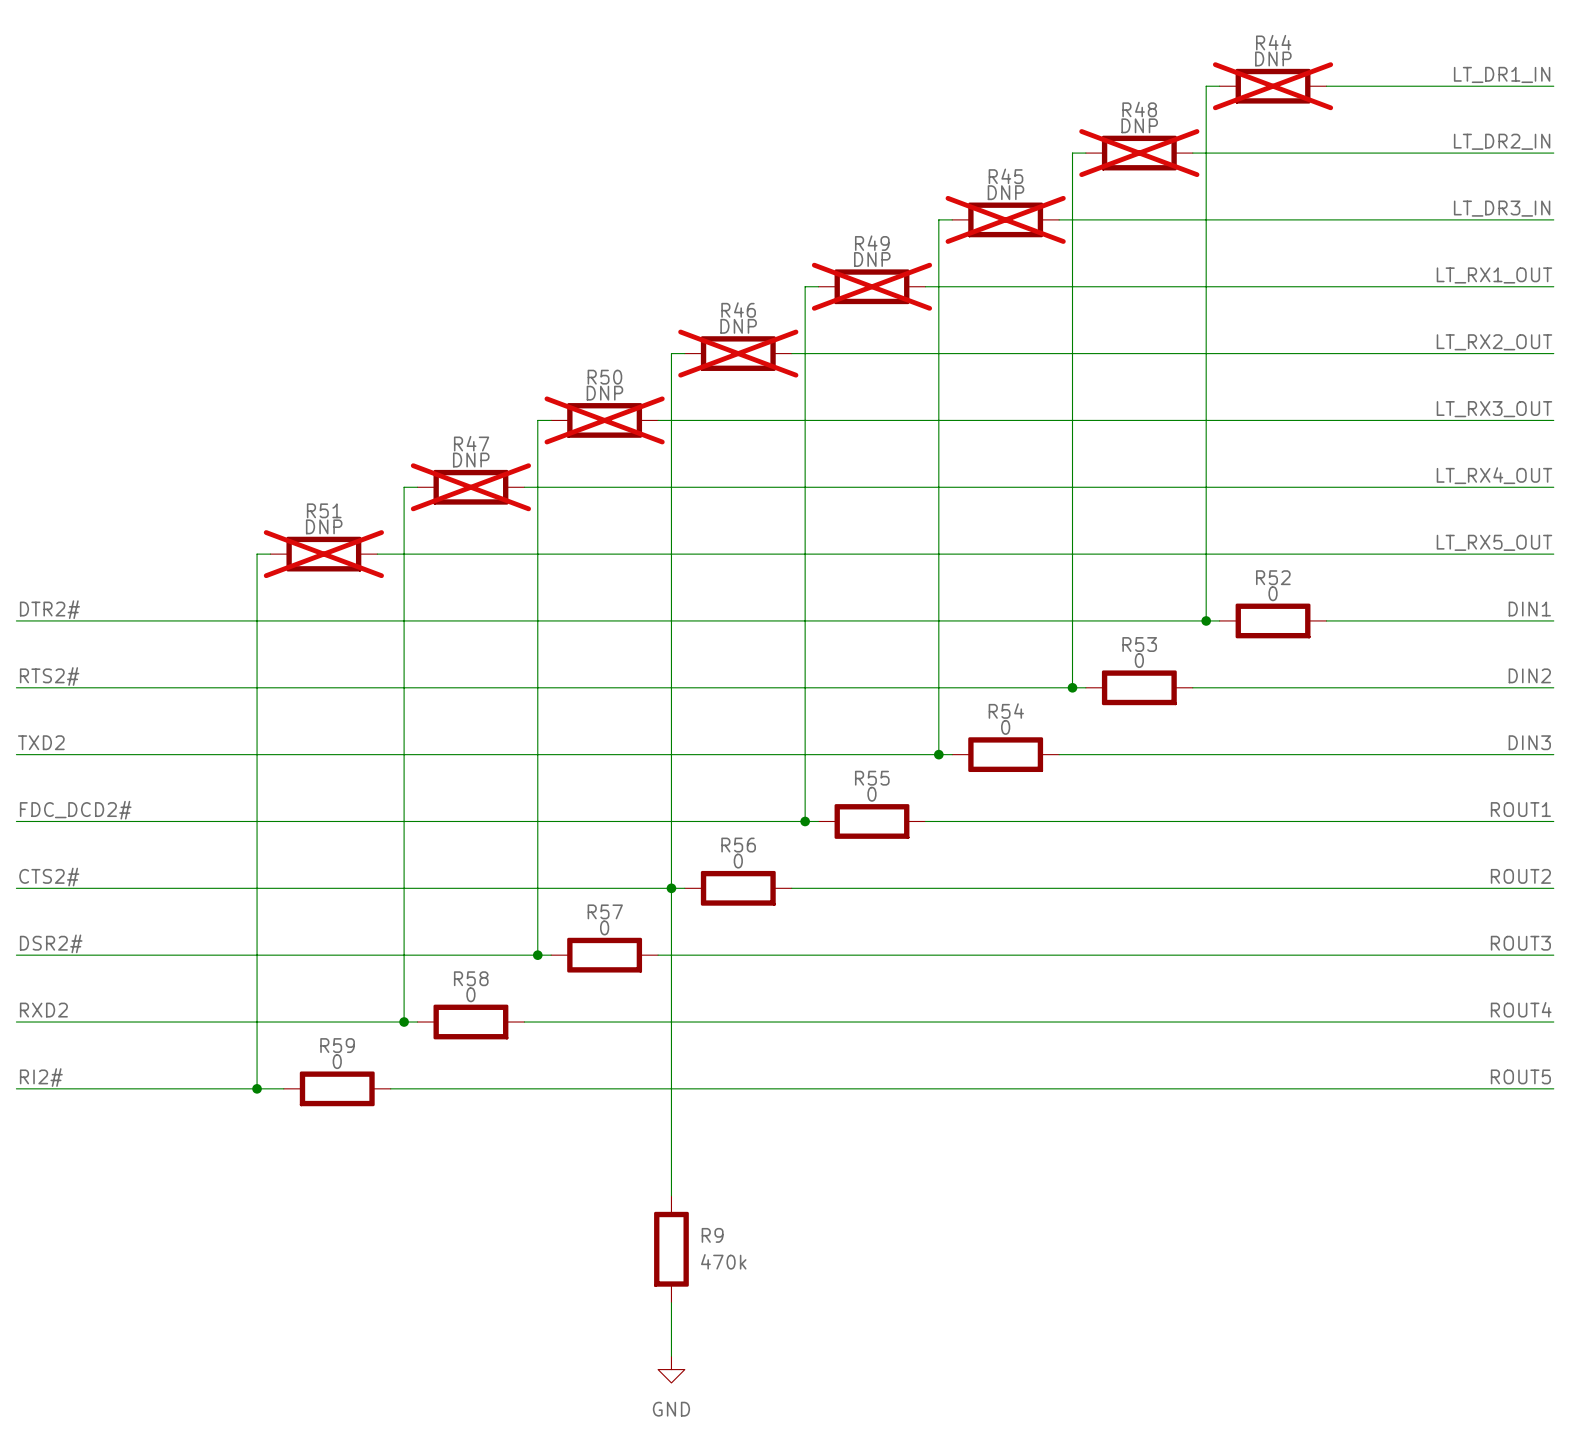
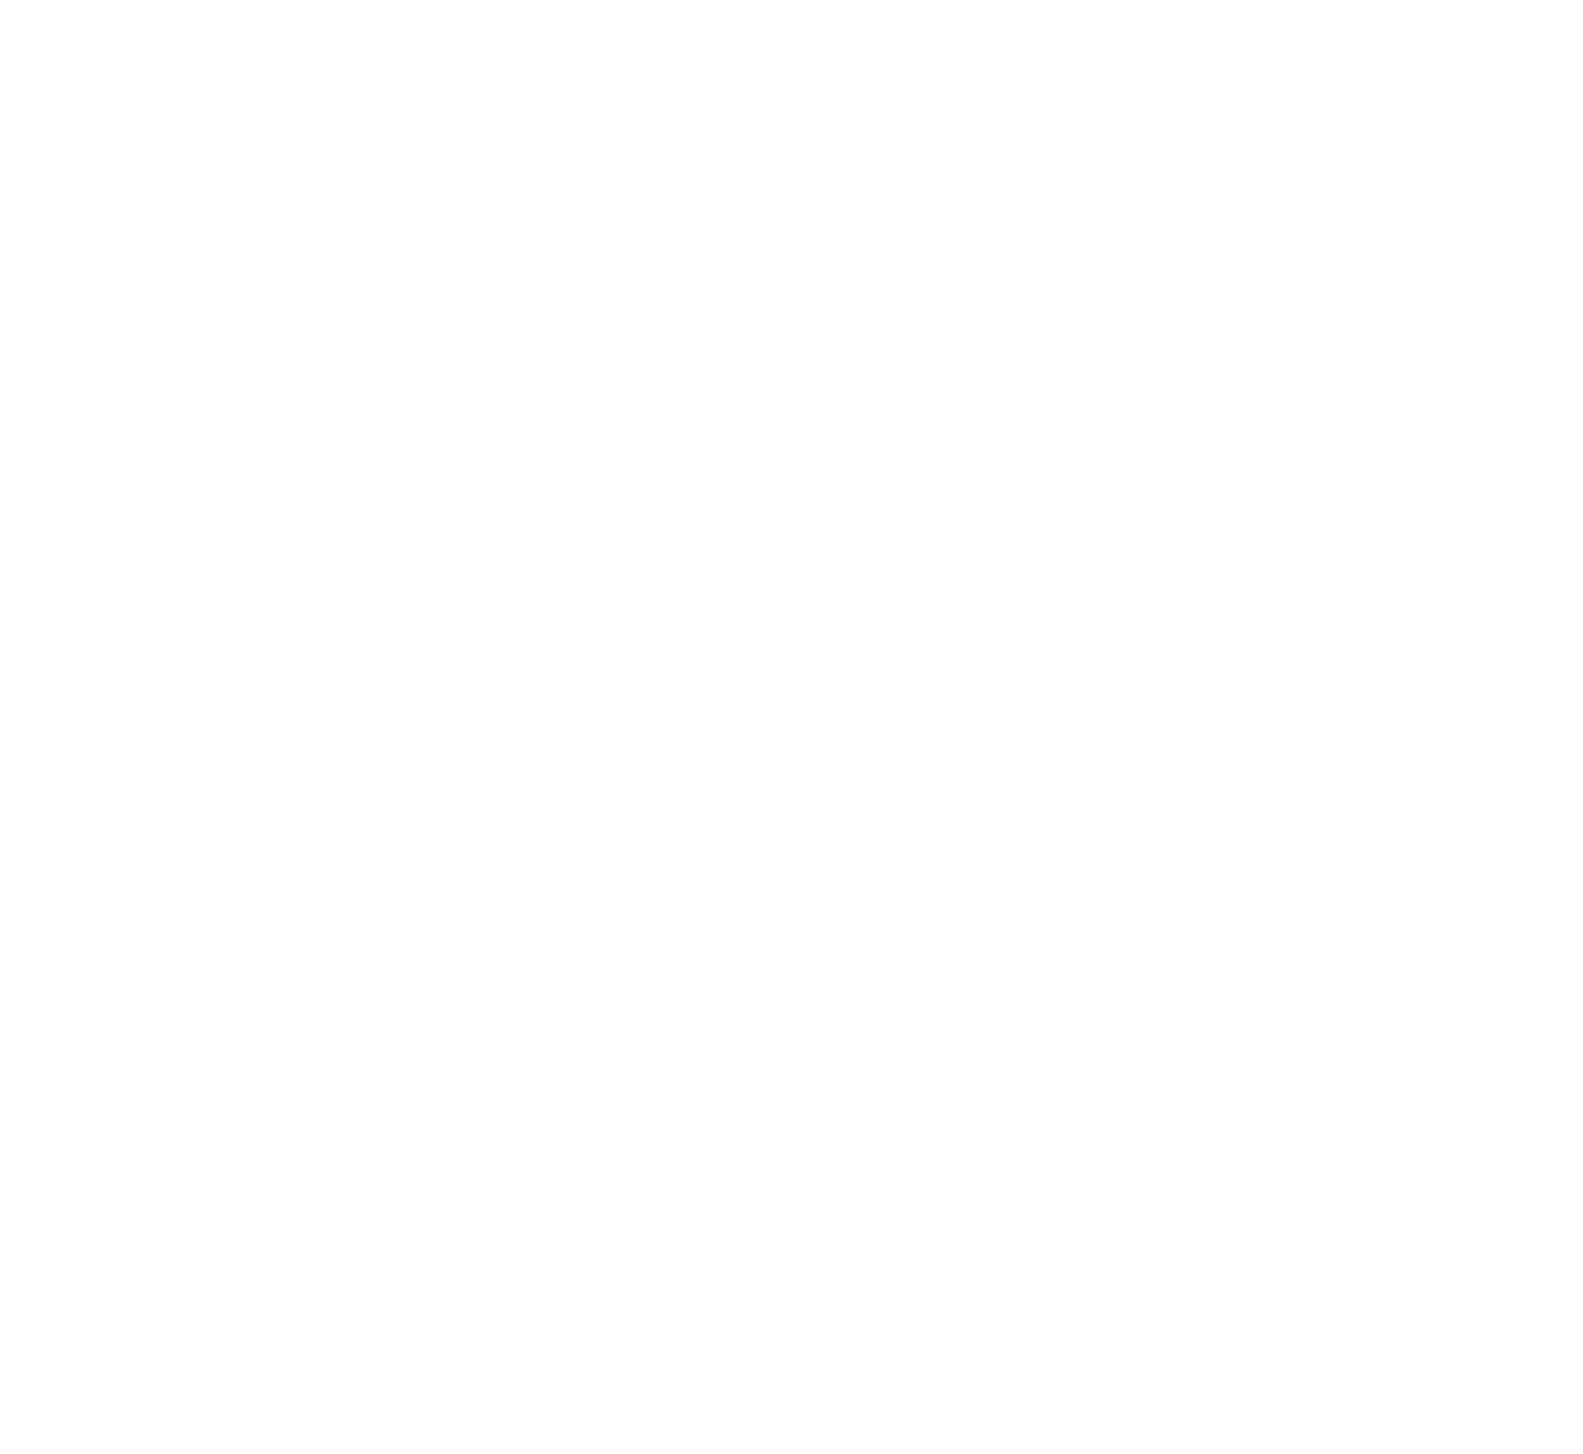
label: LT_DR1_IN (1502, 74) -> none
wire: (1219, 86) (1206, 86) (1206, 620) -> none
R44: DNP (1273, 86) -> none
wire: (1326, 86) (1553, 86) -> none
label: LT_DR2_IN (1502, 141) -> none
wire: (1085, 153) (1072, 153) (1072, 687) -> none
R48: DNP (1139, 153) -> none
wire: (1192, 153) (1553, 153) -> none
label: LT_DR3_IN (1502, 208) -> none
wire: (952, 219) (938, 219) (938, 754) -> none
R45: DNP (1005, 219) -> none
wire: (1059, 219) (1553, 219) -> none
label: LT_RX1_OUT (1494, 275) -> none
wire: (818, 286) (805, 286) (805, 821) -> none
R49: DNP (871, 286) -> none
wire: (925, 286) (1553, 286) -> none
label: LT_RX2_OUT (1494, 342) -> none
wire: (684, 353) (671, 353) (671, 1195) -> none
R46: DNP (738, 353) -> none
wire: (791, 353) (1553, 353) -> none
label: LT_RX3_OUT (1494, 409) -> none
wire: (551, 420) (537, 420) (537, 955) -> none
R50: DNP (604, 420) -> none
wire: (658, 420) (1553, 420) -> none
label: LT_RX4_OUT (1494, 475) -> none
wire: (417, 487) (404, 487) (404, 1022) -> none
R47: DNP (470, 487) -> none
wire: (524, 487) (1553, 487) -> none
label: LT_RX5_OUT (1494, 542) -> none
wire: (270, 554) (257, 554) (257, 1088) -> none
R51: DNP (323, 554) -> none
wire: (377, 554) (1553, 554) -> none
label: DTR2# (49, 609) -> none
label: DIN1 (1529, 609) -> none
wire: (16, 620) (1219, 620) -> none
junction: (1206, 620) -> none
R52: 0 (1273, 620) -> none
wire: (1326, 620) (1553, 620) -> none
label: DIN2 (1529, 675) -> none
label: RTS2# (49, 676) -> none
wire: (16, 687) (1085, 687) -> none
junction: (1072, 687) -> none
R53: 0 (1139, 687) -> none
wire: (1192, 687) (1553, 687) -> none
label: TXD2 (41, 742) -> none
label: DIN3 (1529, 742) -> none
wire: (16, 754) (952, 754) -> none
junction: (938, 754) -> none
R54: 0 (1005, 754) -> none
wire: (1059, 754) (1553, 754) -> none
label: ROUT1 (1520, 809) -> none
label: FDC_DCD2# (75, 810) -> none
wire: (16, 821) (818, 821) -> none
junction: (805, 821) -> none
R55: 0 (871, 821) -> none
wire: (925, 821) (1553, 821) -> none
label: ROUT2 (1520, 876) -> none
label: CTS2# (49, 877) -> none
wire: (16, 888) (684, 888) -> none
junction: (671, 888) -> none
R56: 0 (738, 888) -> none
wire: (791, 888) (1553, 888) -> none
label: DSR2# (51, 943) -> none
label: ROUT3 (1520, 943) -> none
wire: (16, 955) (551, 955) -> none
junction: (537, 955) -> none
R57: 0 (604, 955) -> none
wire: (658, 955) (1553, 955) -> none
label: ROUT4 (1521, 1009) -> none
label: RXD2 (43, 1010) -> none
wire: (16, 1022) (417, 1022) -> none
junction: (404, 1022) -> none
R58: 0 (470, 1022) -> none
wire: (524, 1022) (1553, 1022) -> none
label: ROUT5 (1520, 1076) -> none
label: RI2# (41, 1077) -> none
wire: (16, 1088) (283, 1088) -> none
junction: (257, 1088) -> none
R59: 0 (337, 1088) -> none
wire: (390, 1088) (1553, 1088) -> none
R9: 470k (671, 1249) -> none
wire: (671, 1302) (671, 1356) -> none
power symbol: GND (671, 1369) -> none

